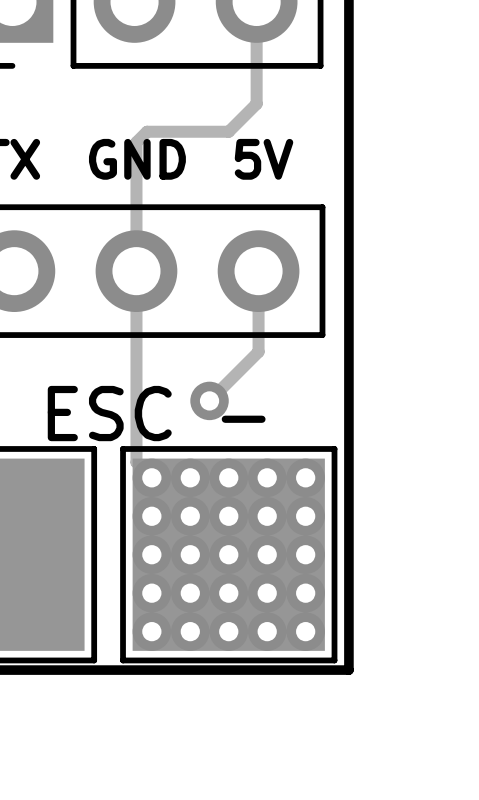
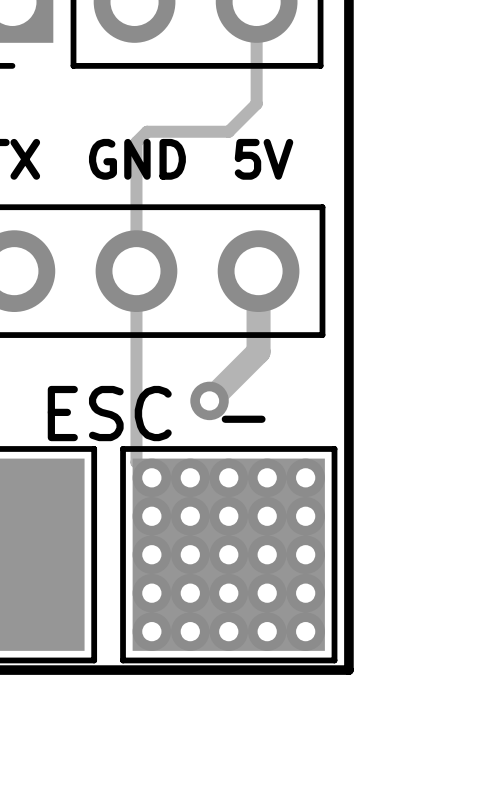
track width: thin (258, 271) (258, 351) (209, 400) -> thick (258, 271) (258, 351) (209, 400)

